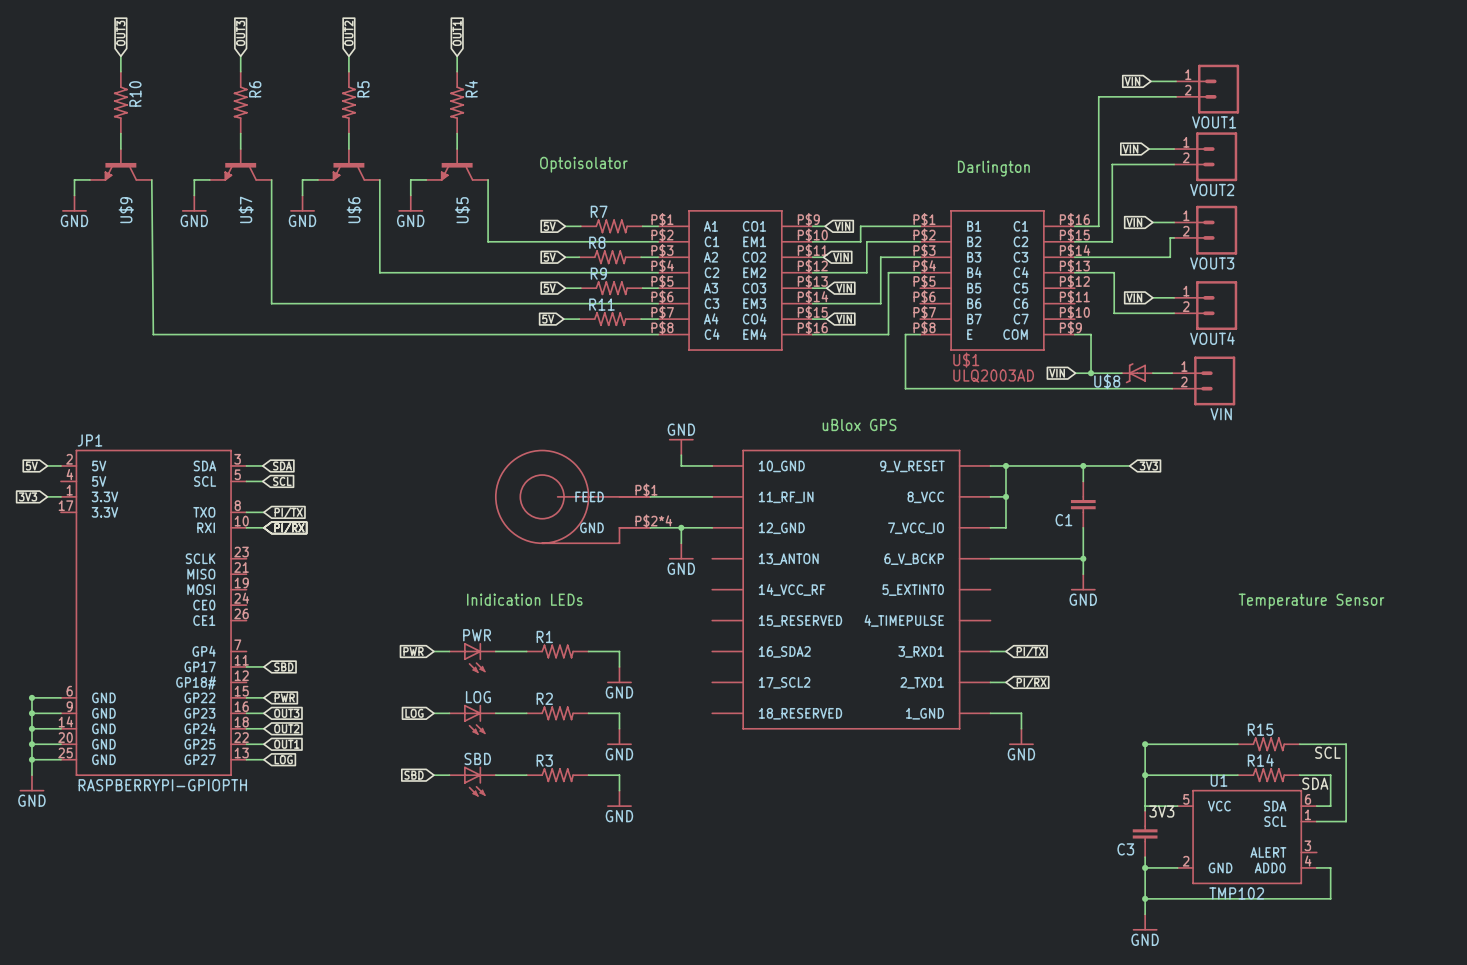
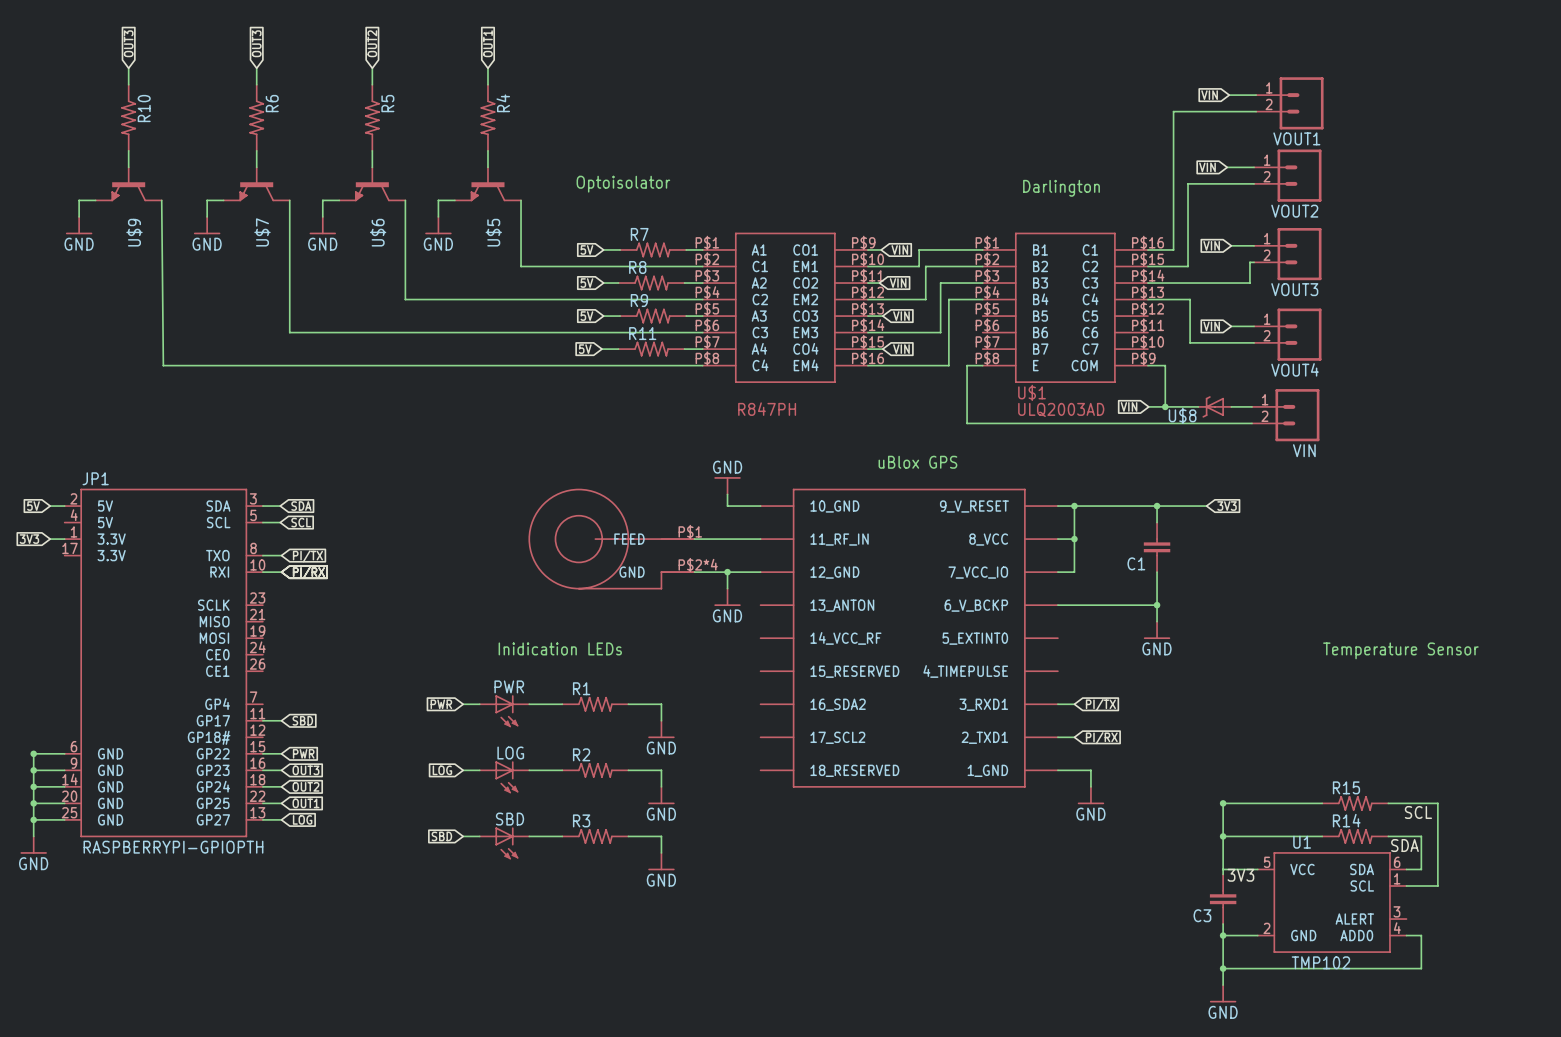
part text: none -> R847PH (767, 409)

